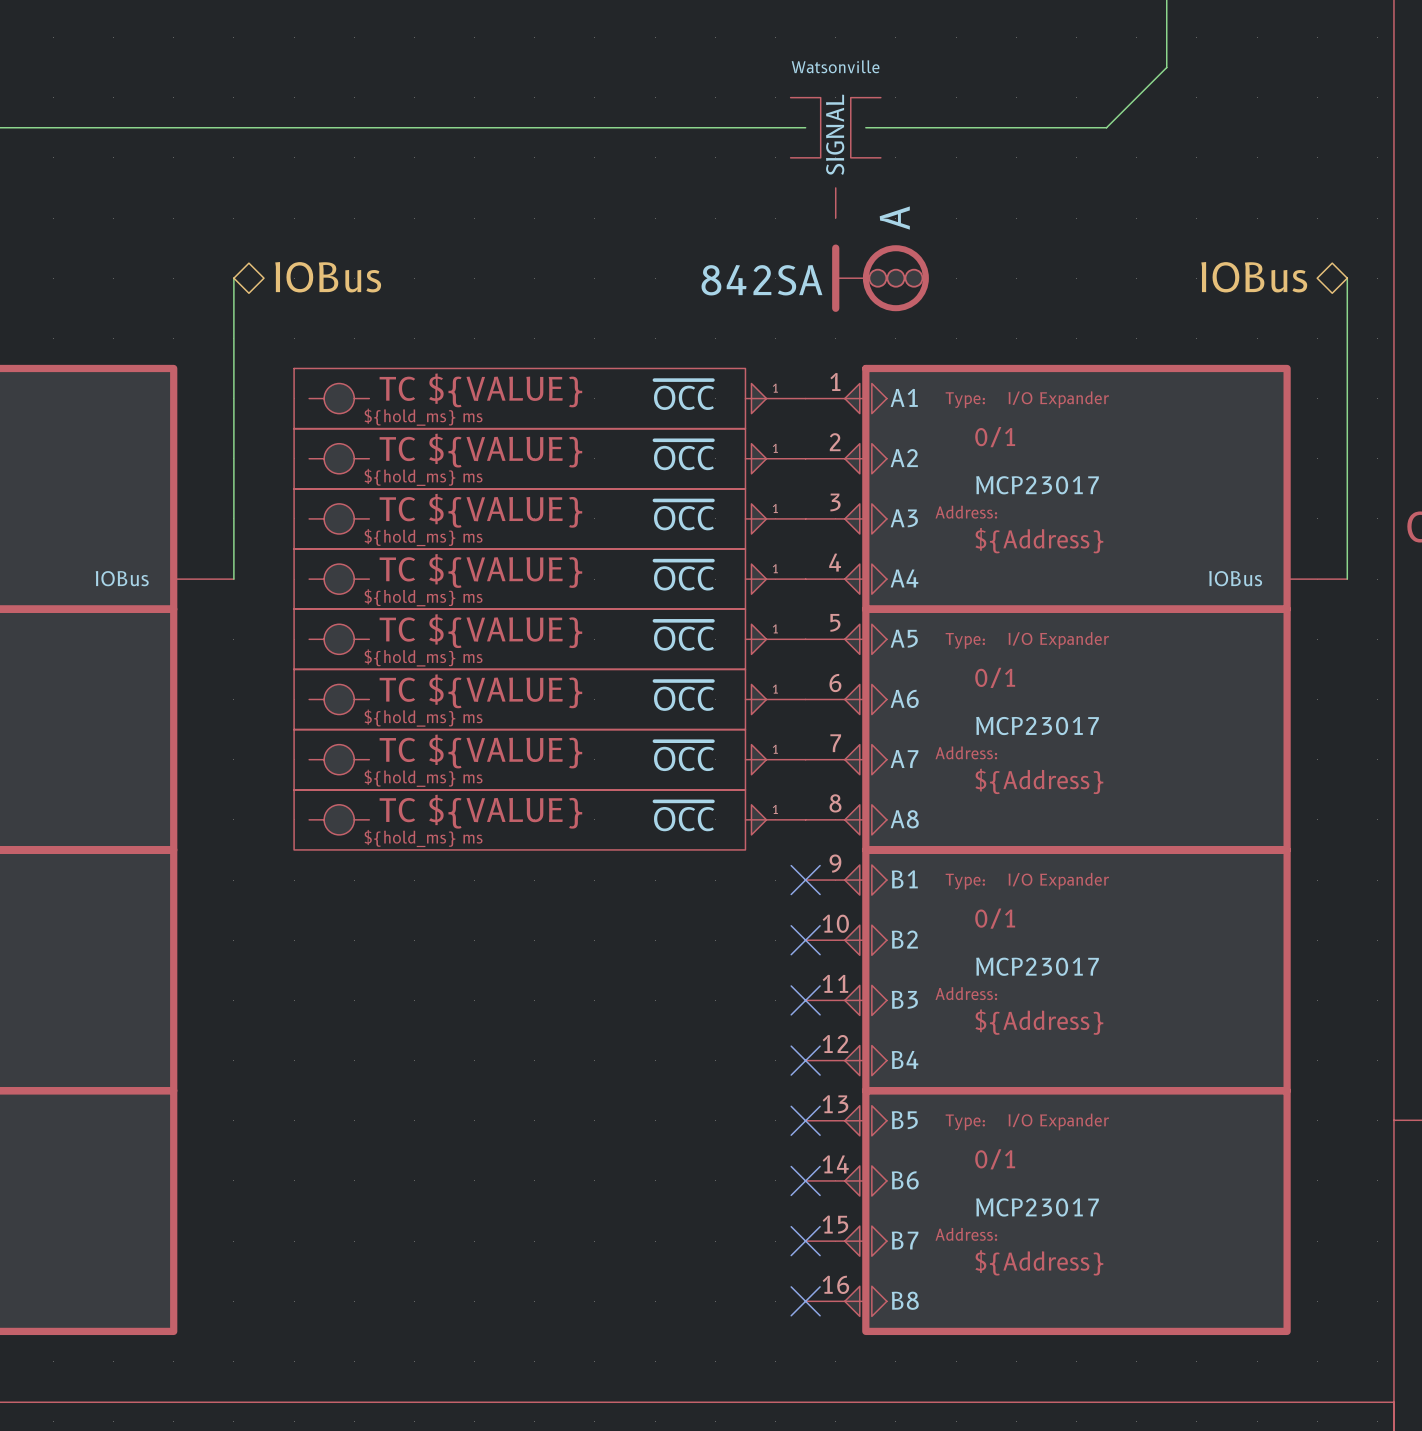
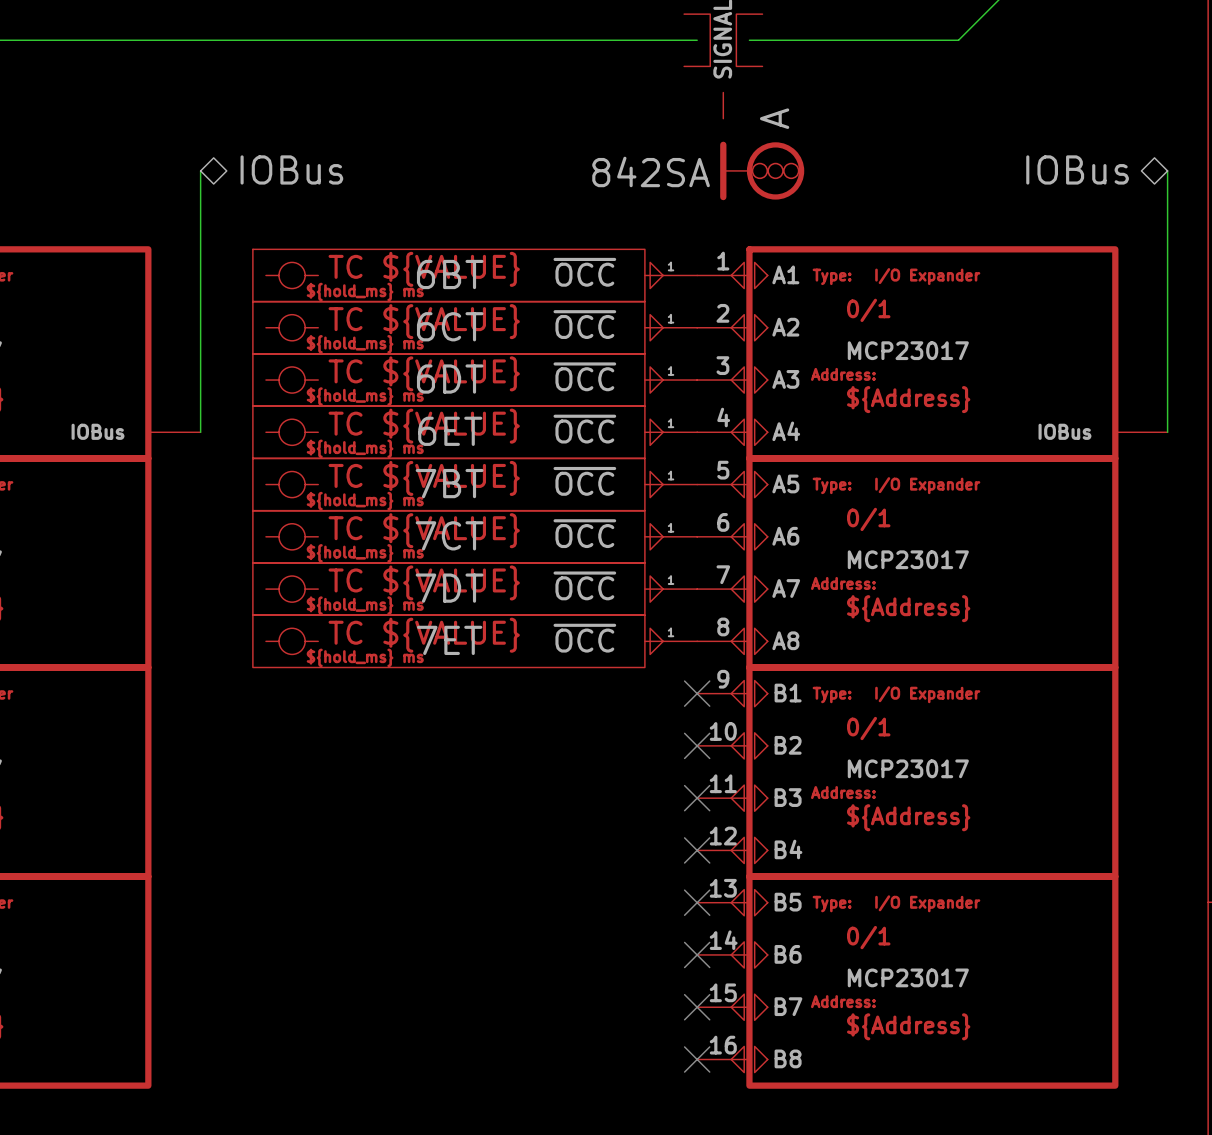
part value: none -> 6BT (450, 274)
part value: none -> 6CT (450, 326)
part value: none -> 6DT (450, 379)
part value: none -> 6ET (450, 431)
part value: none -> 7BT (449, 483)
part value: none -> 7CT (449, 535)
part value: none -> 7DT (449, 588)
part value: none -> 7ET (449, 640)

